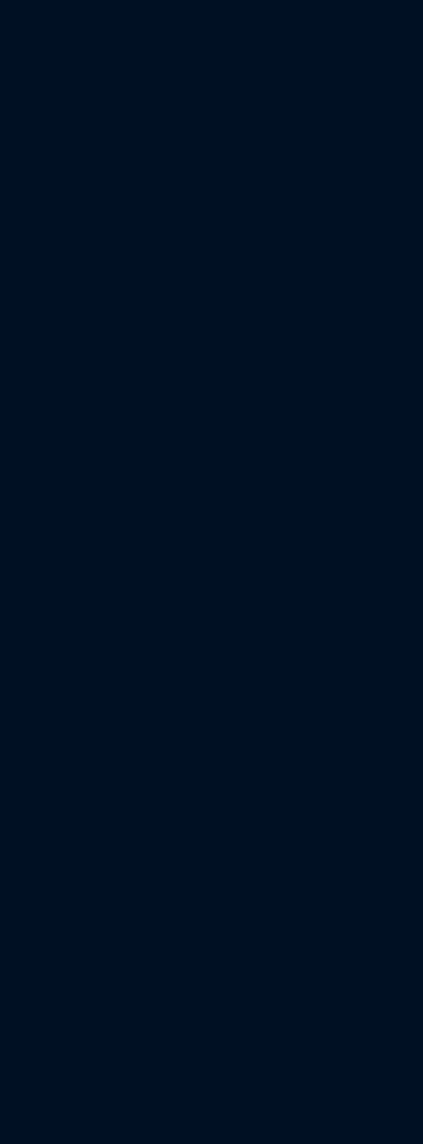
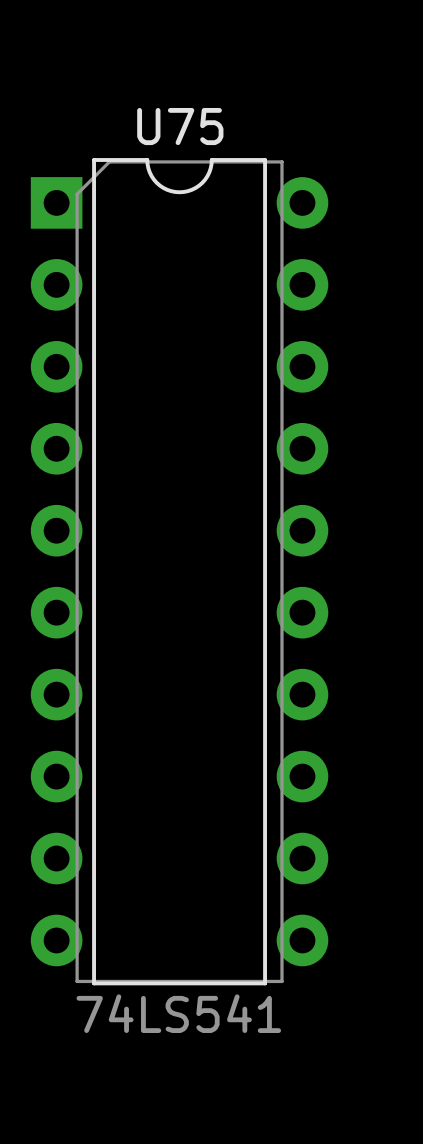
U75: none -> 74LS541 (179, 571)

